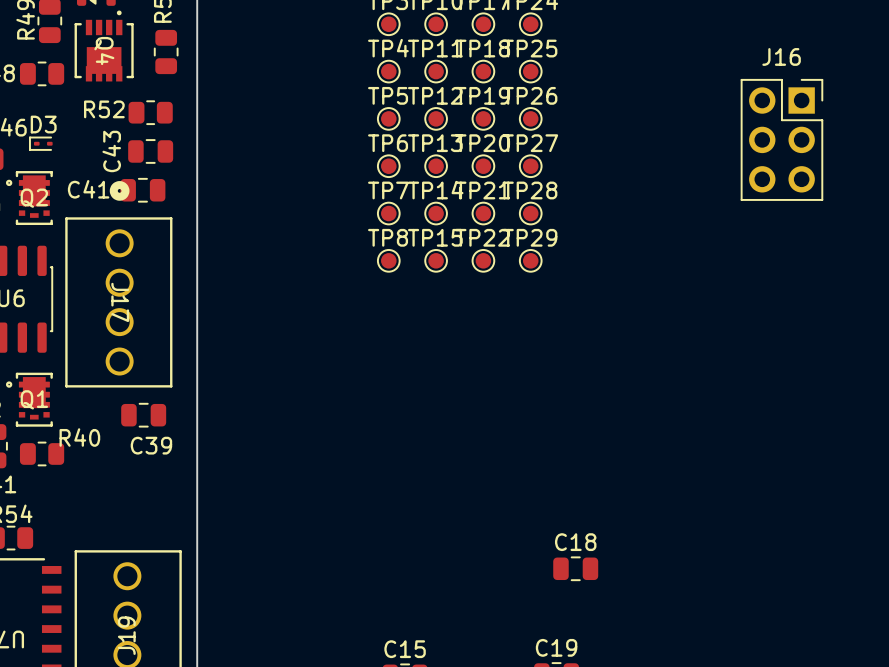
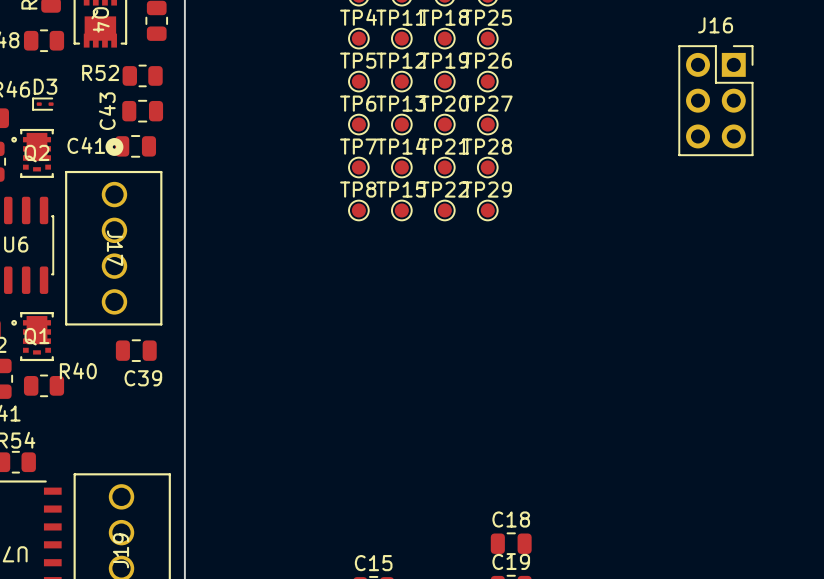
C18 position: (575, 568) -> (511, 543)

